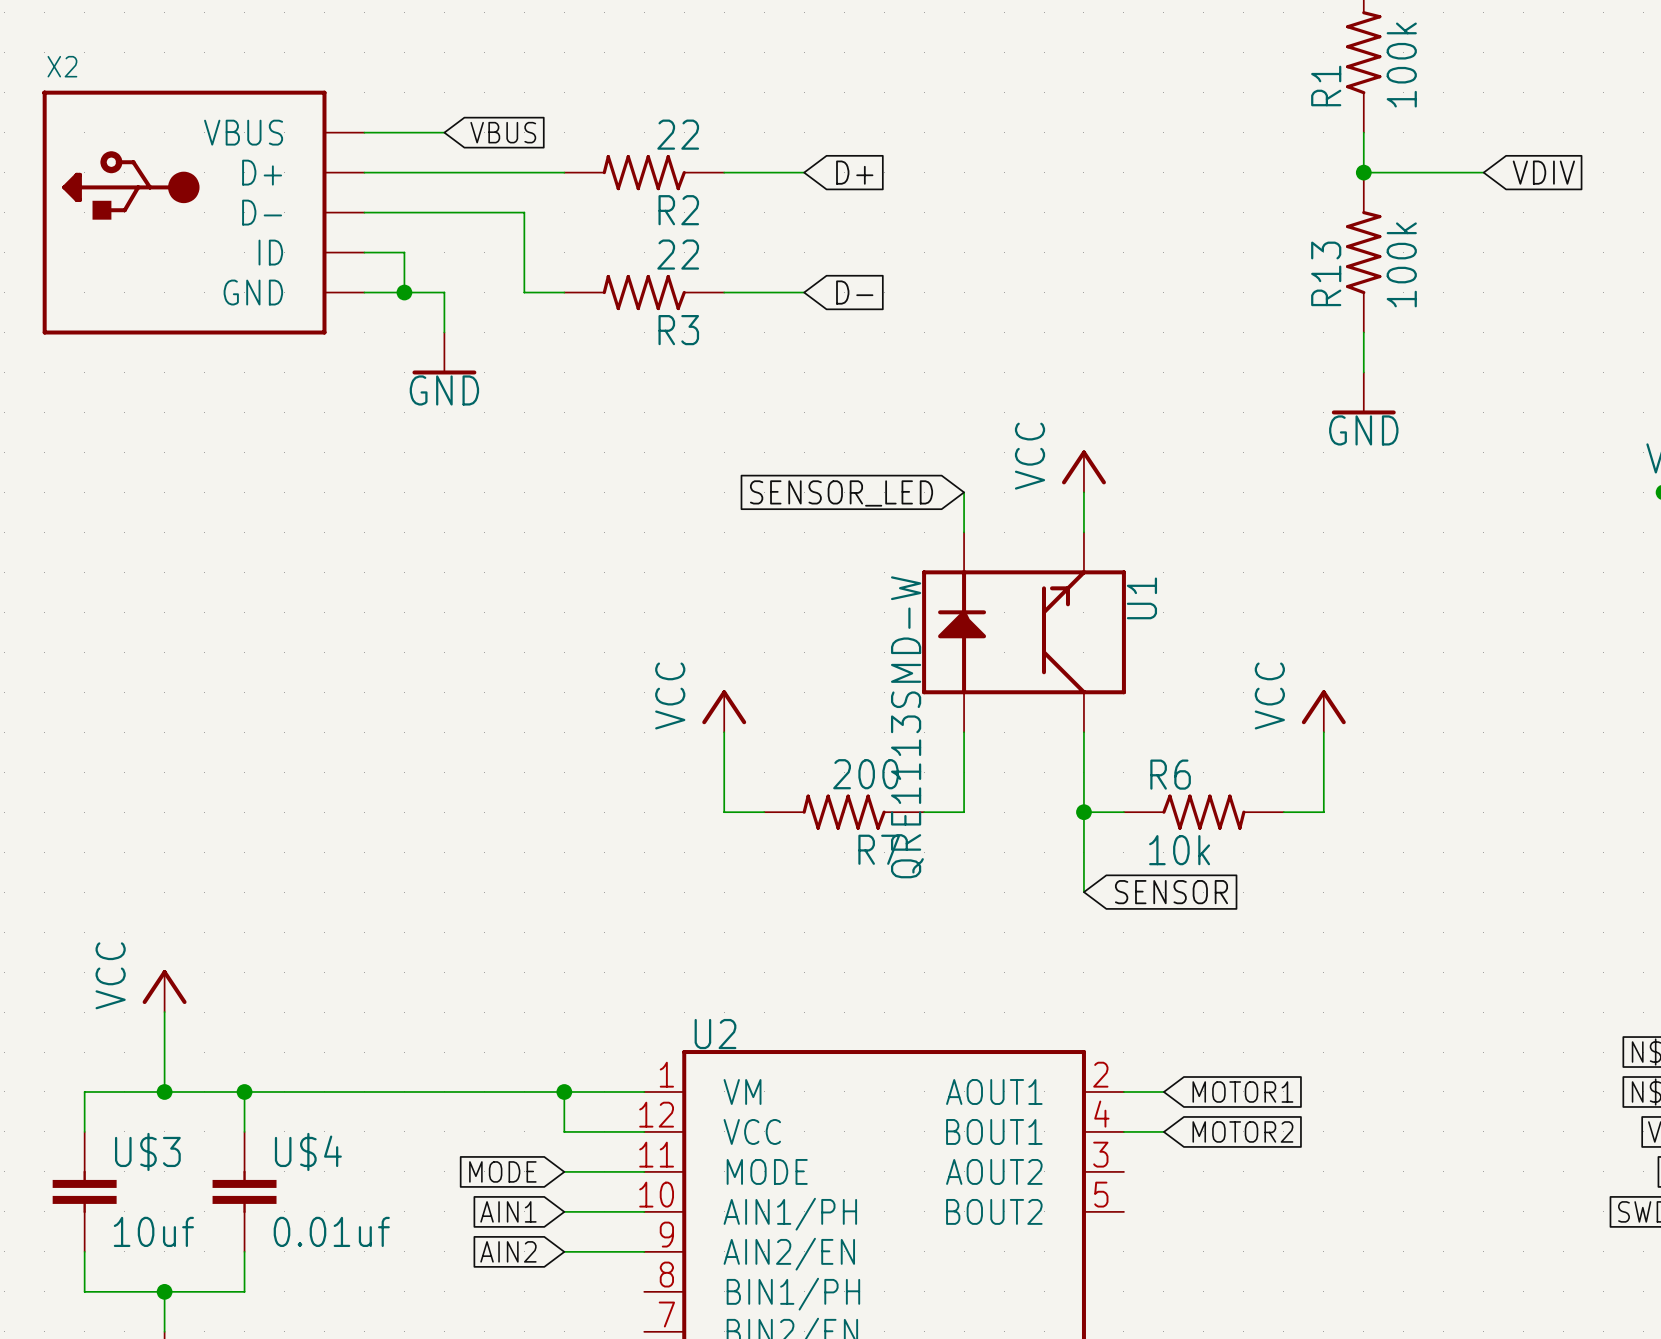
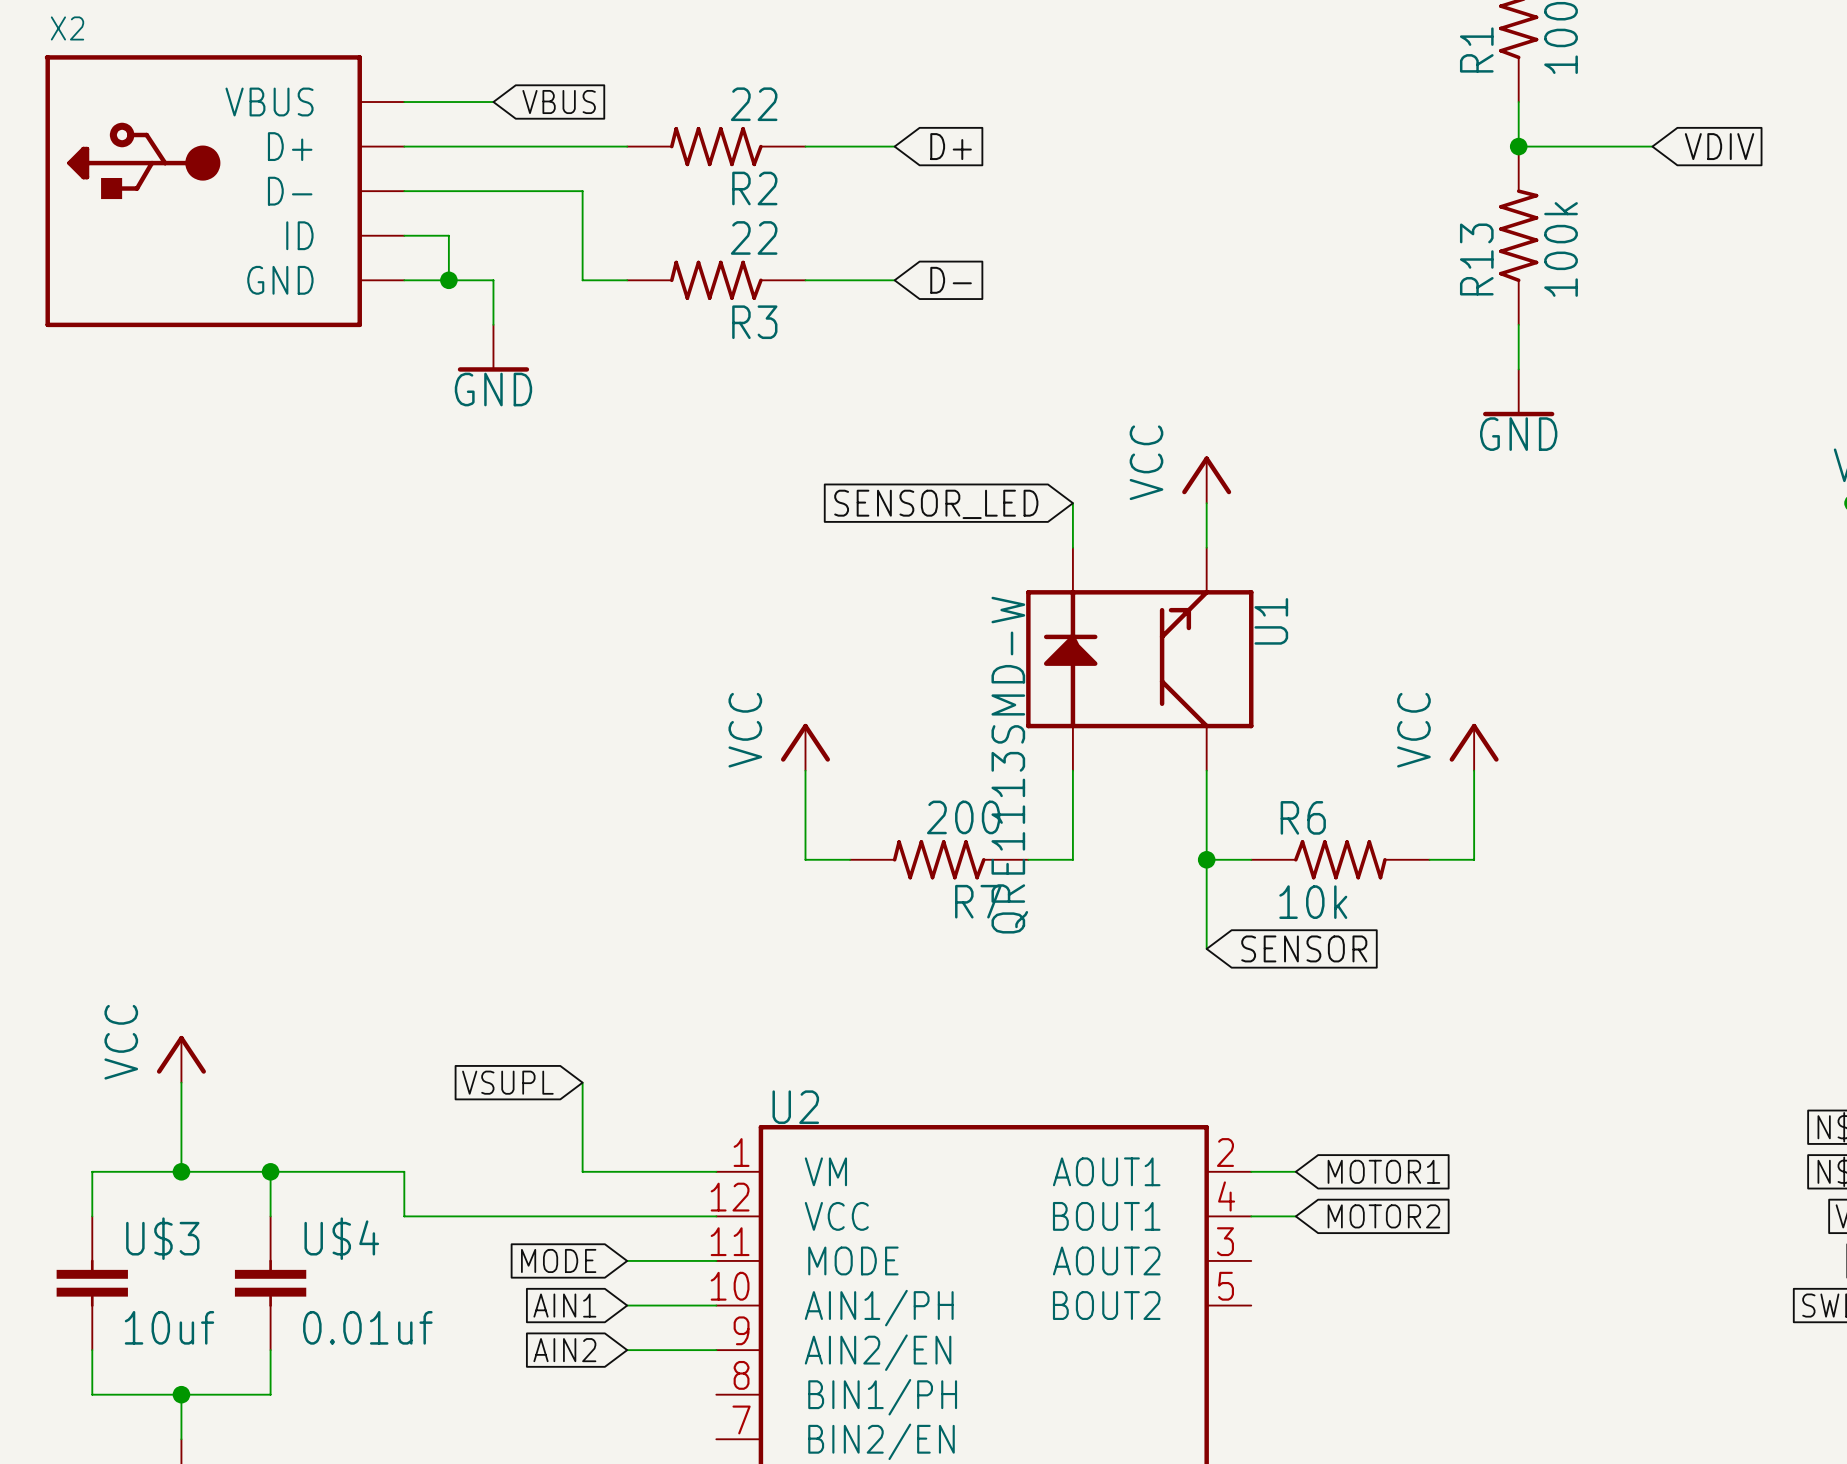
global label: none -> VSUPL (507, 1082)
wire: none -> (582, 1082) (582, 1171)
wire: (364, 1091) (524, 1091) -> (404, 1171) (404, 1216) (627, 1216)
wire: (564, 1091) (564, 1131) -> none
junction: (564, 1091) -> none

